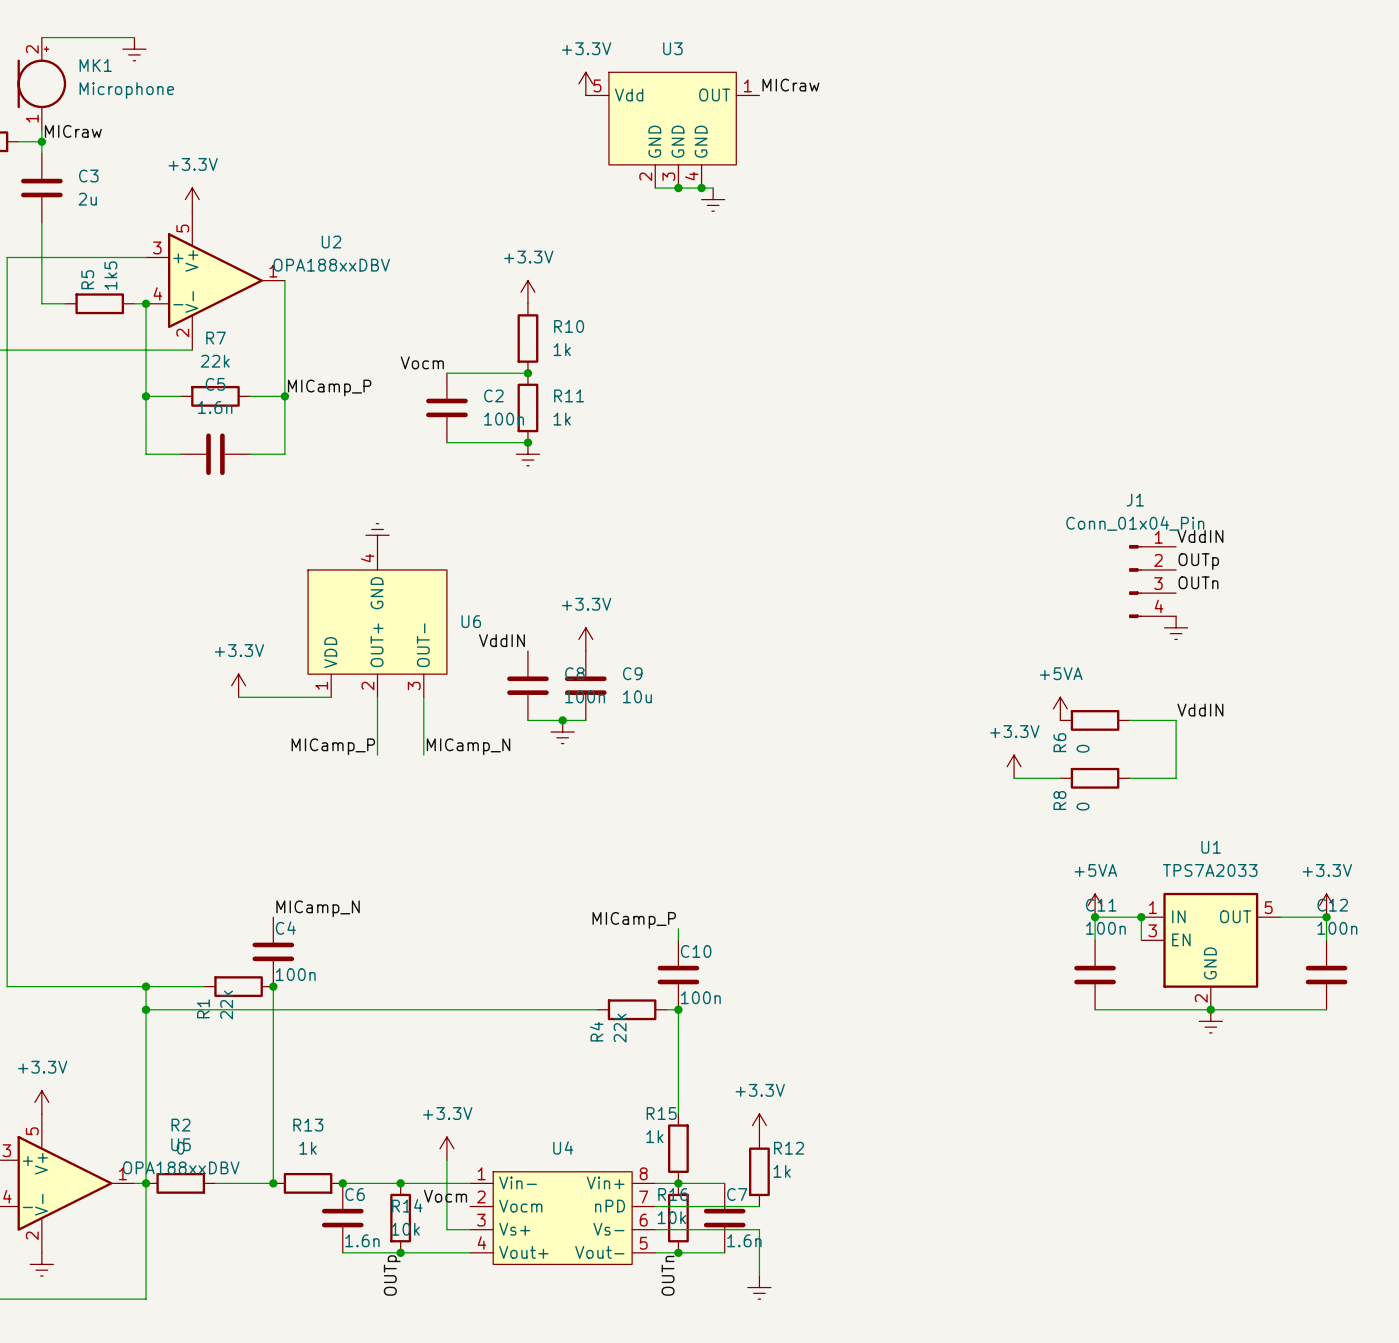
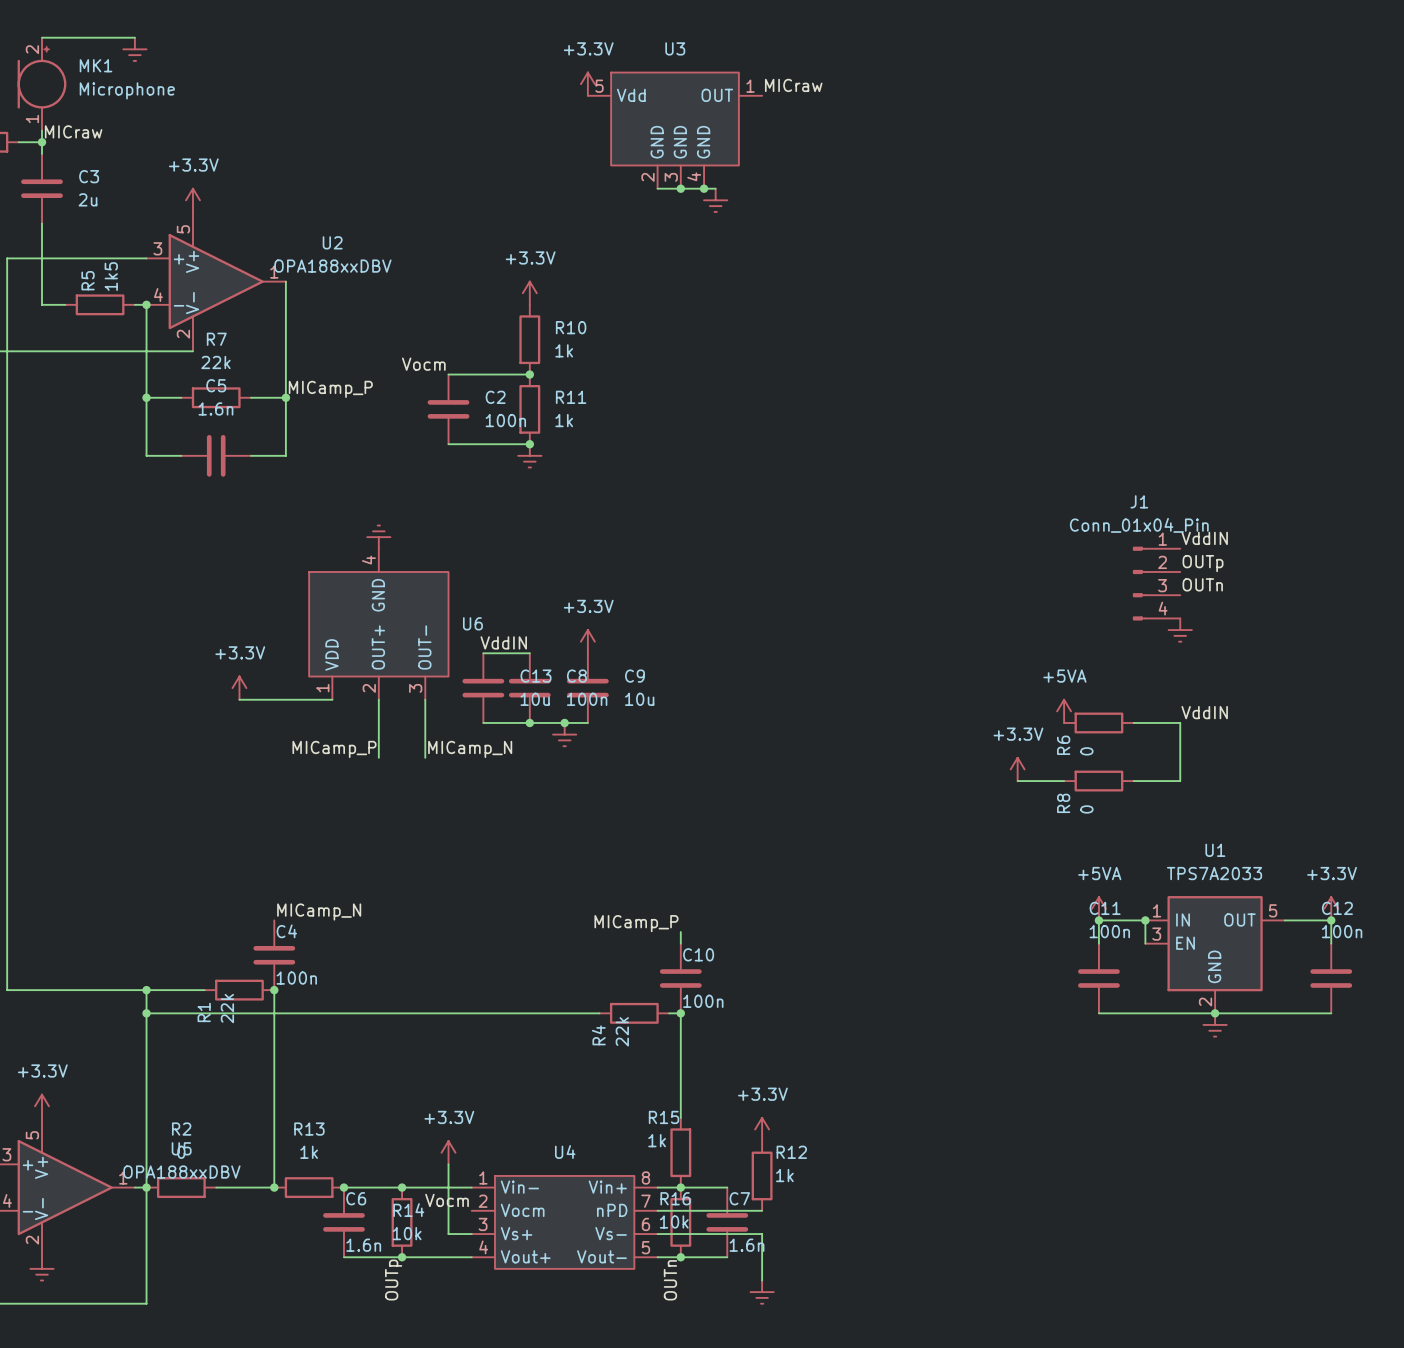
wire: none -> (483, 653) (529, 653)
C13: none -> 10u (483, 688)
wire: none -> (483, 722) (529, 722)
junction: none -> (529, 722)

